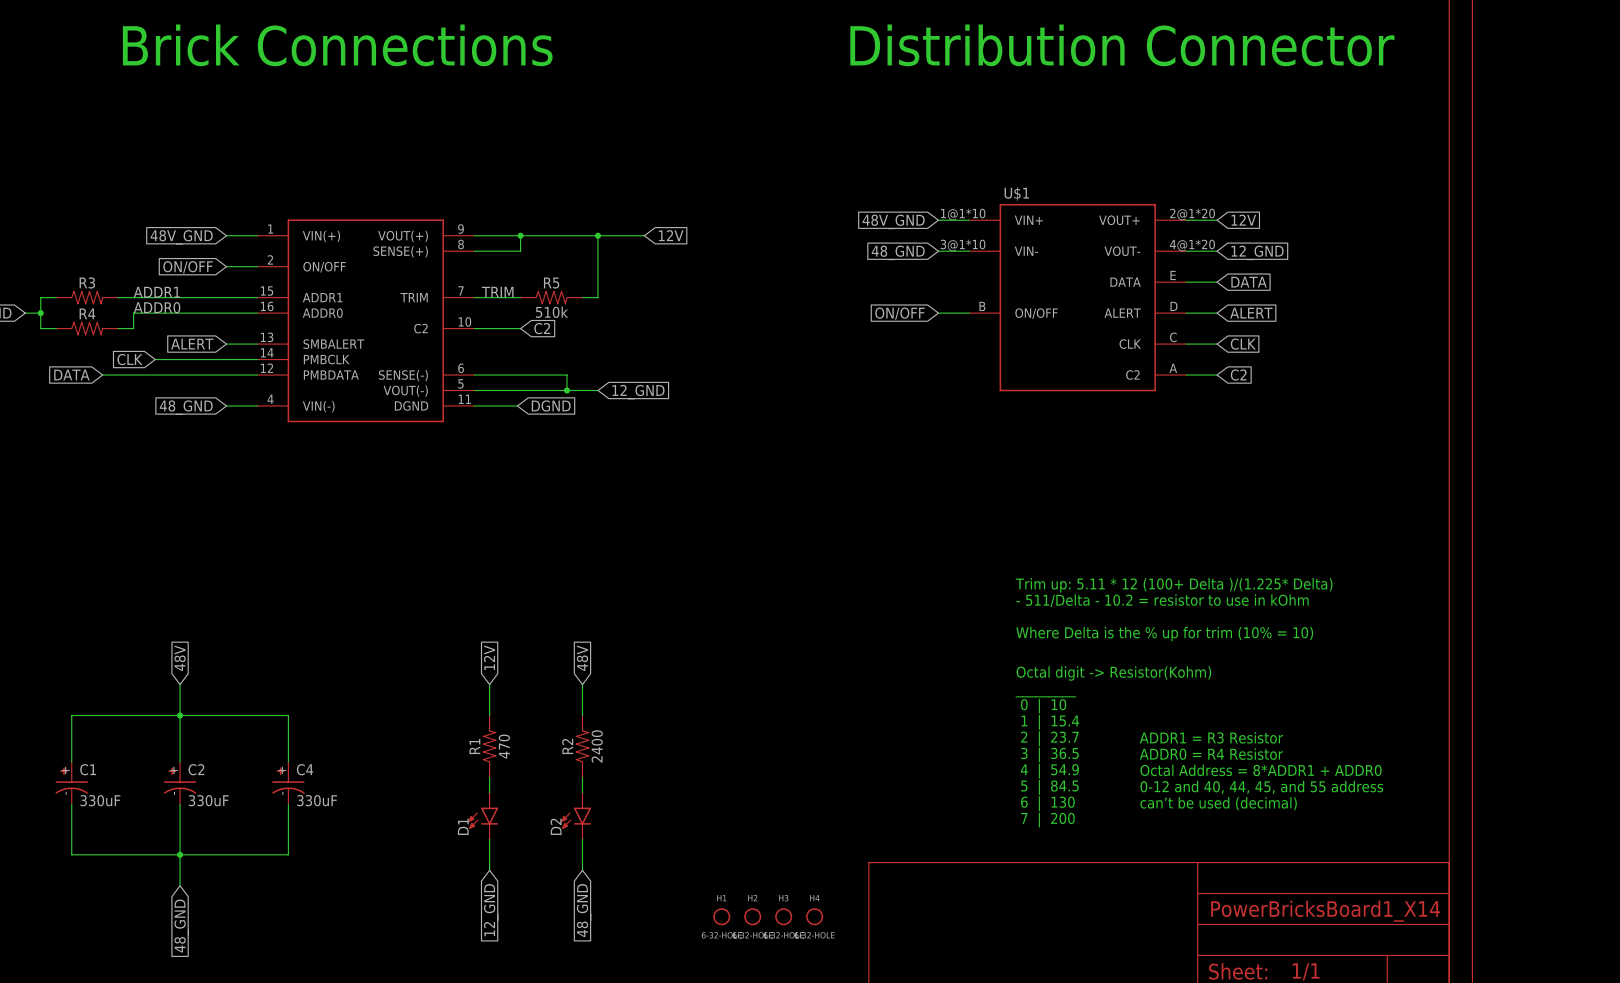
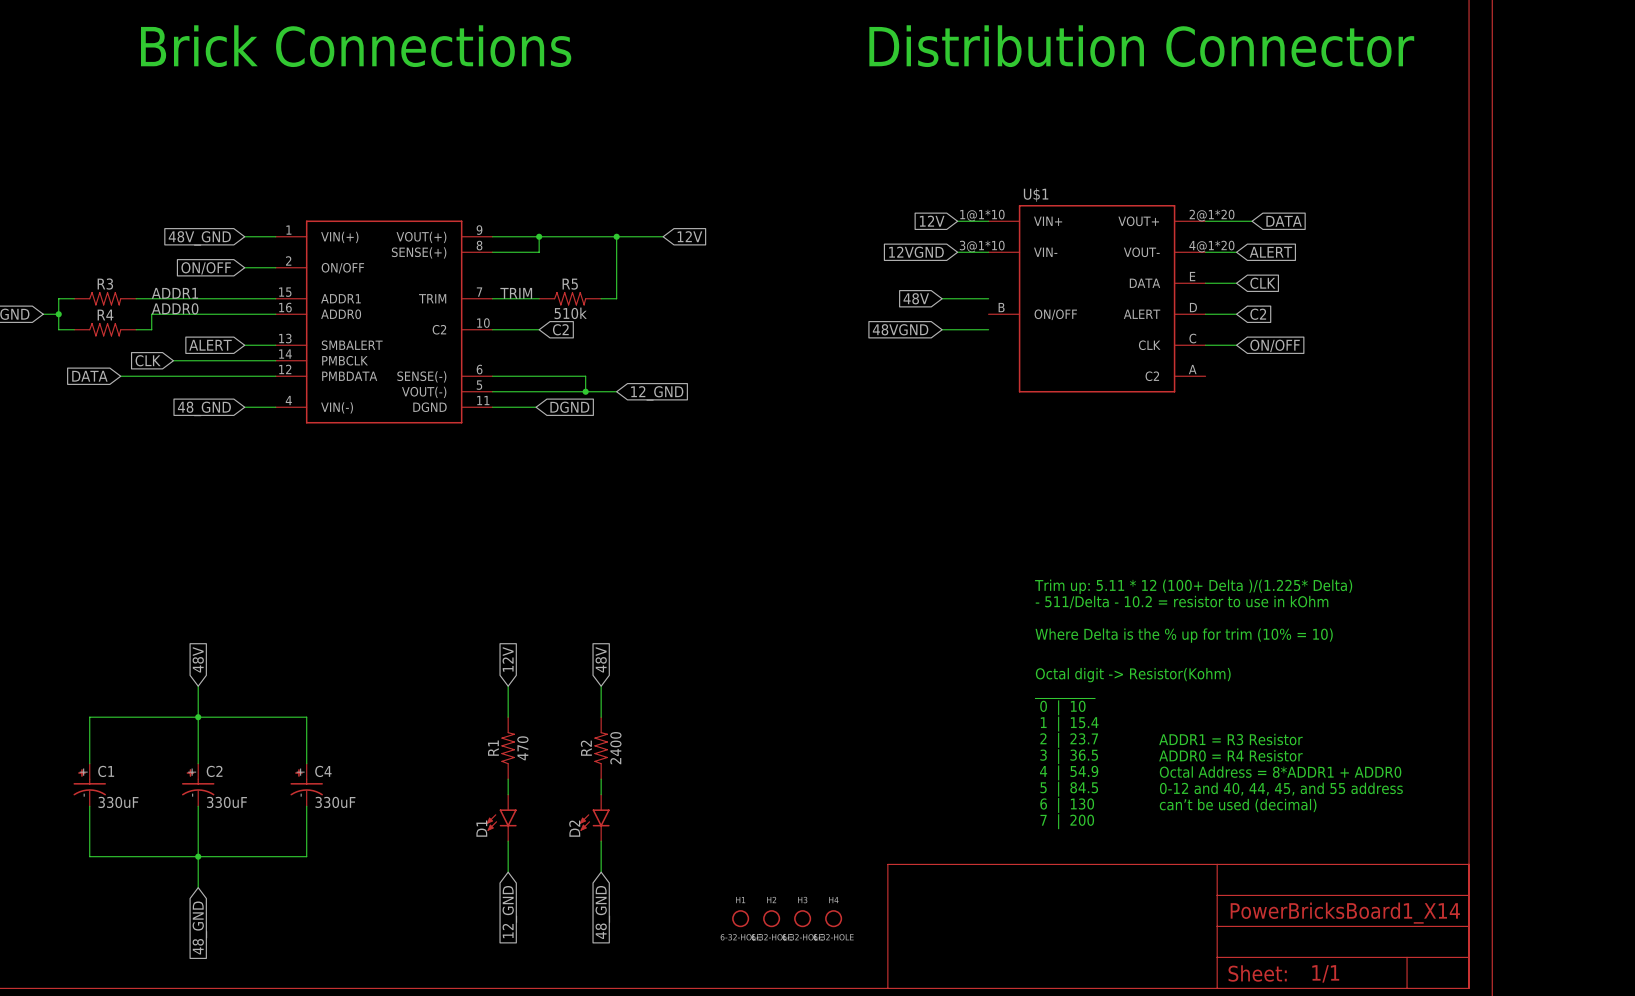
wire: none -> (1236, 221) (1252, 221)
global label: 12V (1243, 220) -> none
global label: none -> DATA (1284, 221)
global label: 48V_GND (893, 221) -> 12V (932, 221)
global label: 48_GND (898, 252) -> 12VGND (916, 252)
global label: 12_GND (1257, 252) -> ALERT (1270, 252)
global label: DATA (1249, 282) -> CLK (1262, 283)
global label: none -> 48V (916, 298)
wire: none -> (942, 298) (988, 298)
global label: ON/OFF (899, 313) -> none
wire: (938, 313) (969, 313) -> none
global label: ALERT (1251, 313) -> C2 (1258, 314)
global label: none -> 48VGND (900, 329)
wire: none -> (942, 329) (988, 329)
global label: CLK (1243, 344) -> ON/OFF (1275, 345)
wire: (1186, 375) (1217, 375) -> none
global label: C2 (1238, 375) -> none

